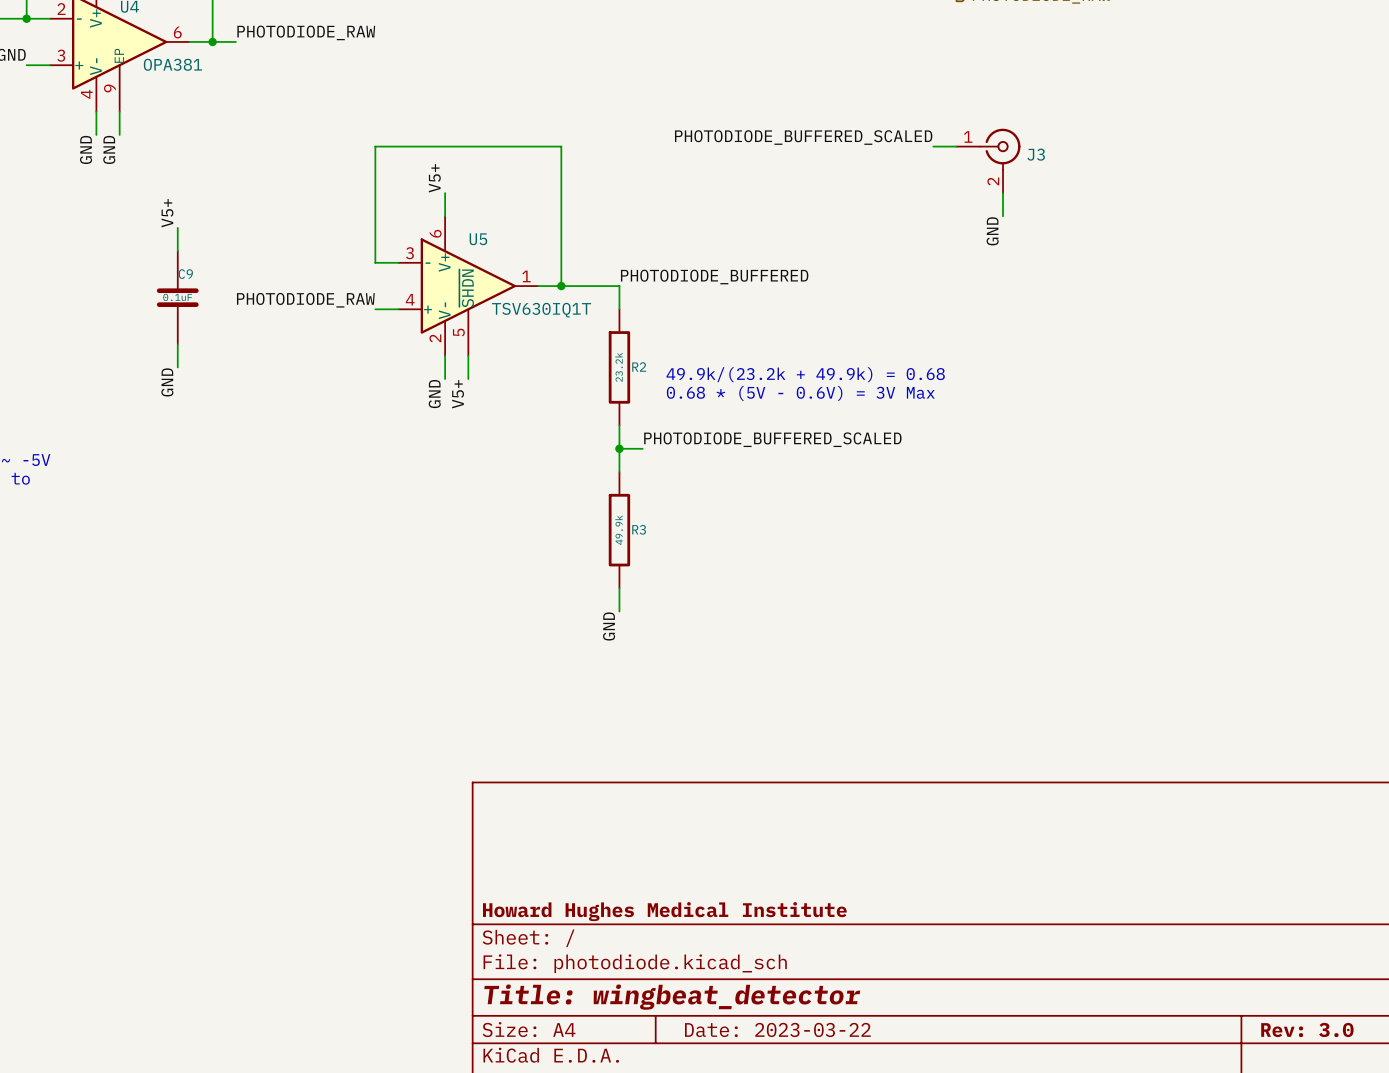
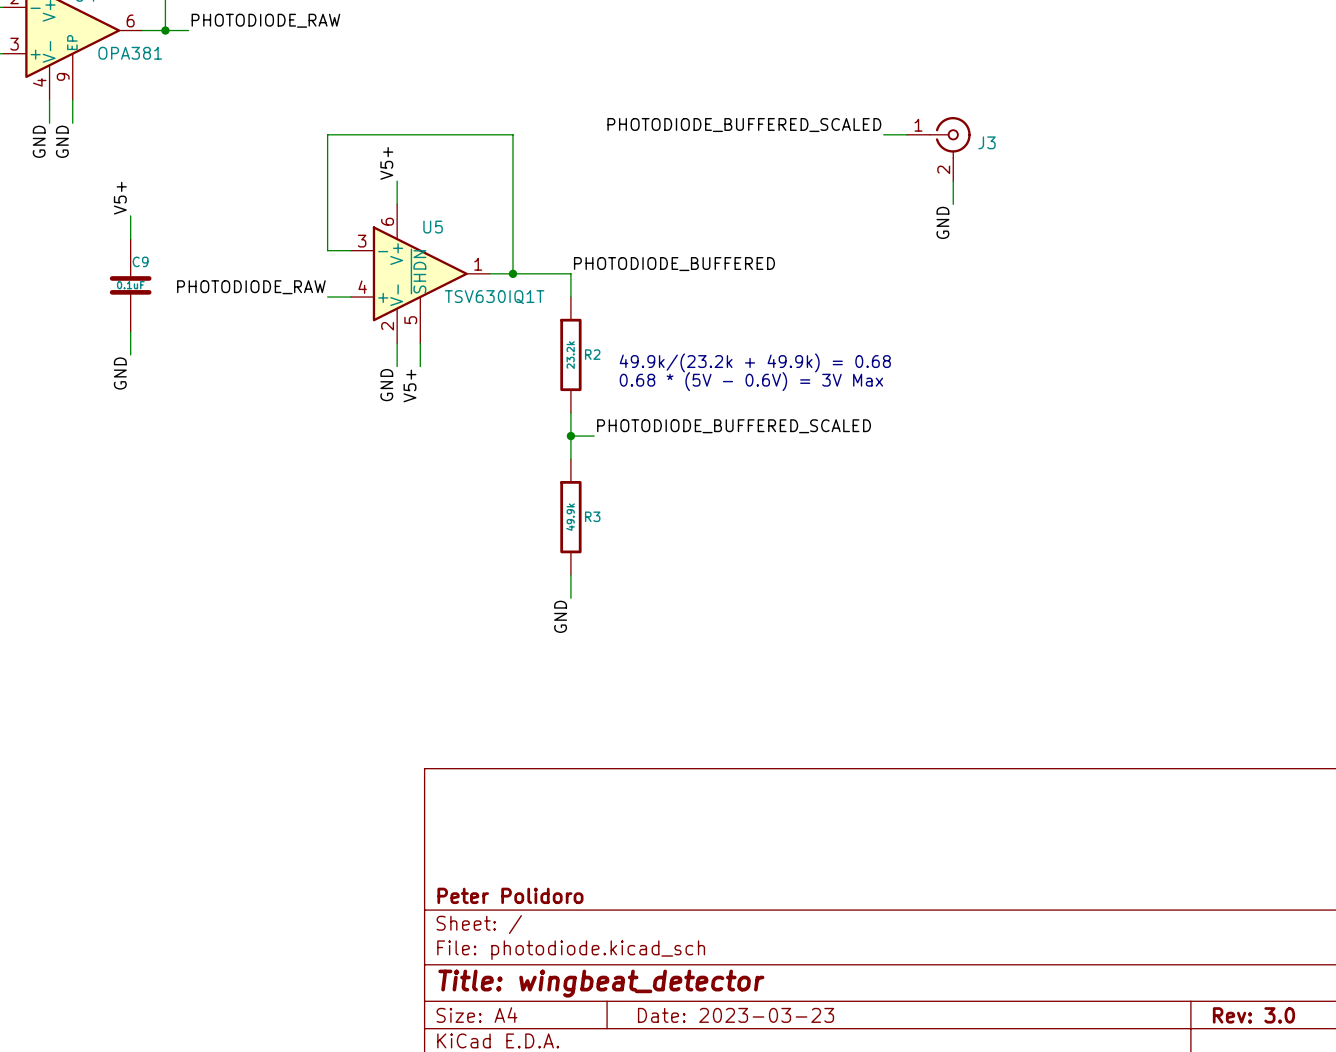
title block: Howard Hughes Medical Institute (664, 911) -> Peter Polidoro (510, 895)
title block: Date: 2023-03-22 (777, 1029) -> Date: 2023-03-23 (736, 1015)

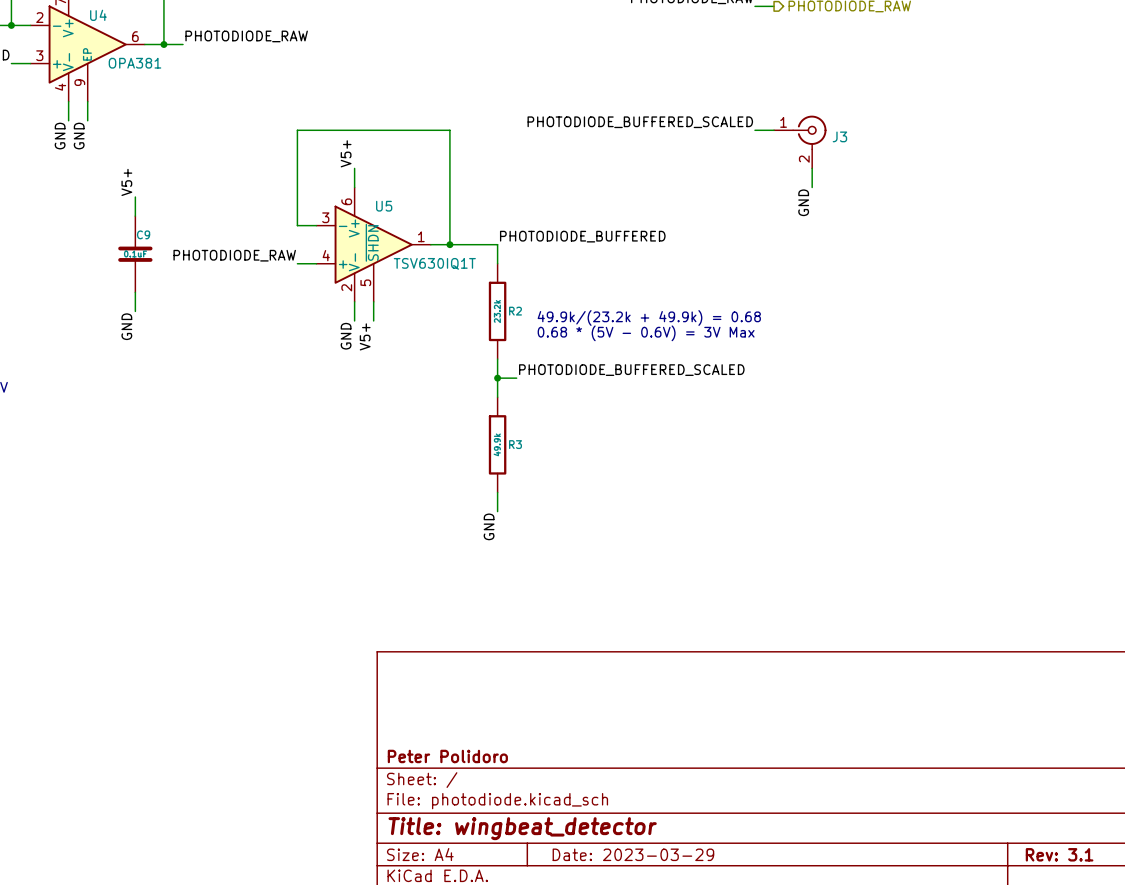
title block: Date: 2023-03-23 (736, 1015) -> Date: 2023-03-29 (633, 854)
title block: Rev: 3.0 (1253, 1015) -> Rev: 3.1 (1059, 854)

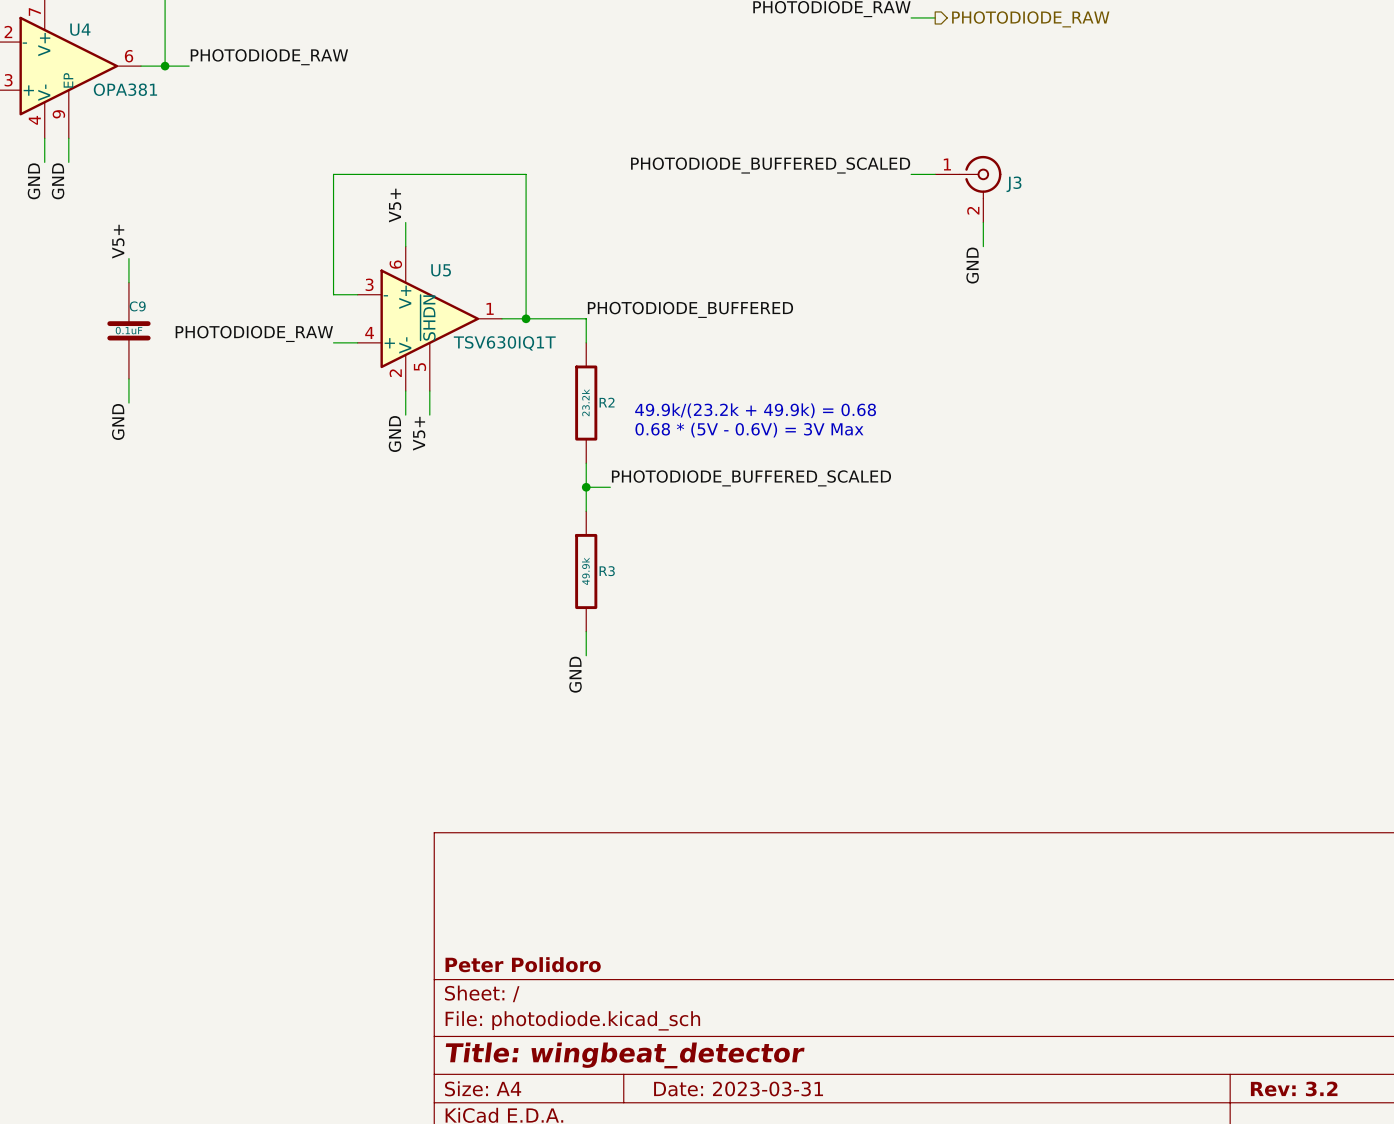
title block: Date: 2023-03-29 (633, 854) -> Date: 2023-03-31 (738, 1088)
title block: Rev: 3.1 (1059, 854) -> Rev: 3.2 (1294, 1088)

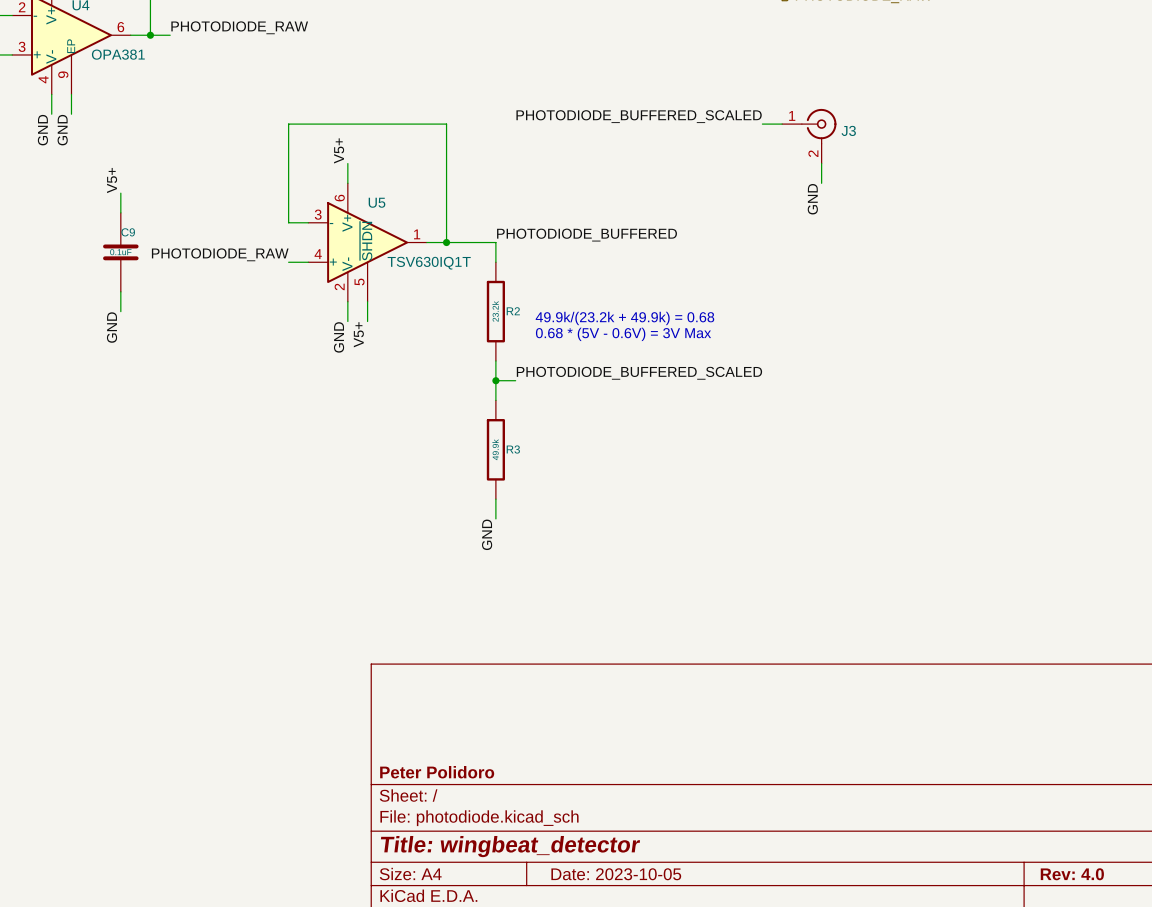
title block: Date: 2023-03-31 (738, 1088) -> Date: 2023-10-05 (616, 874)
title block: Rev: 3.2 (1294, 1088) -> Rev: 4.0 (1072, 874)

